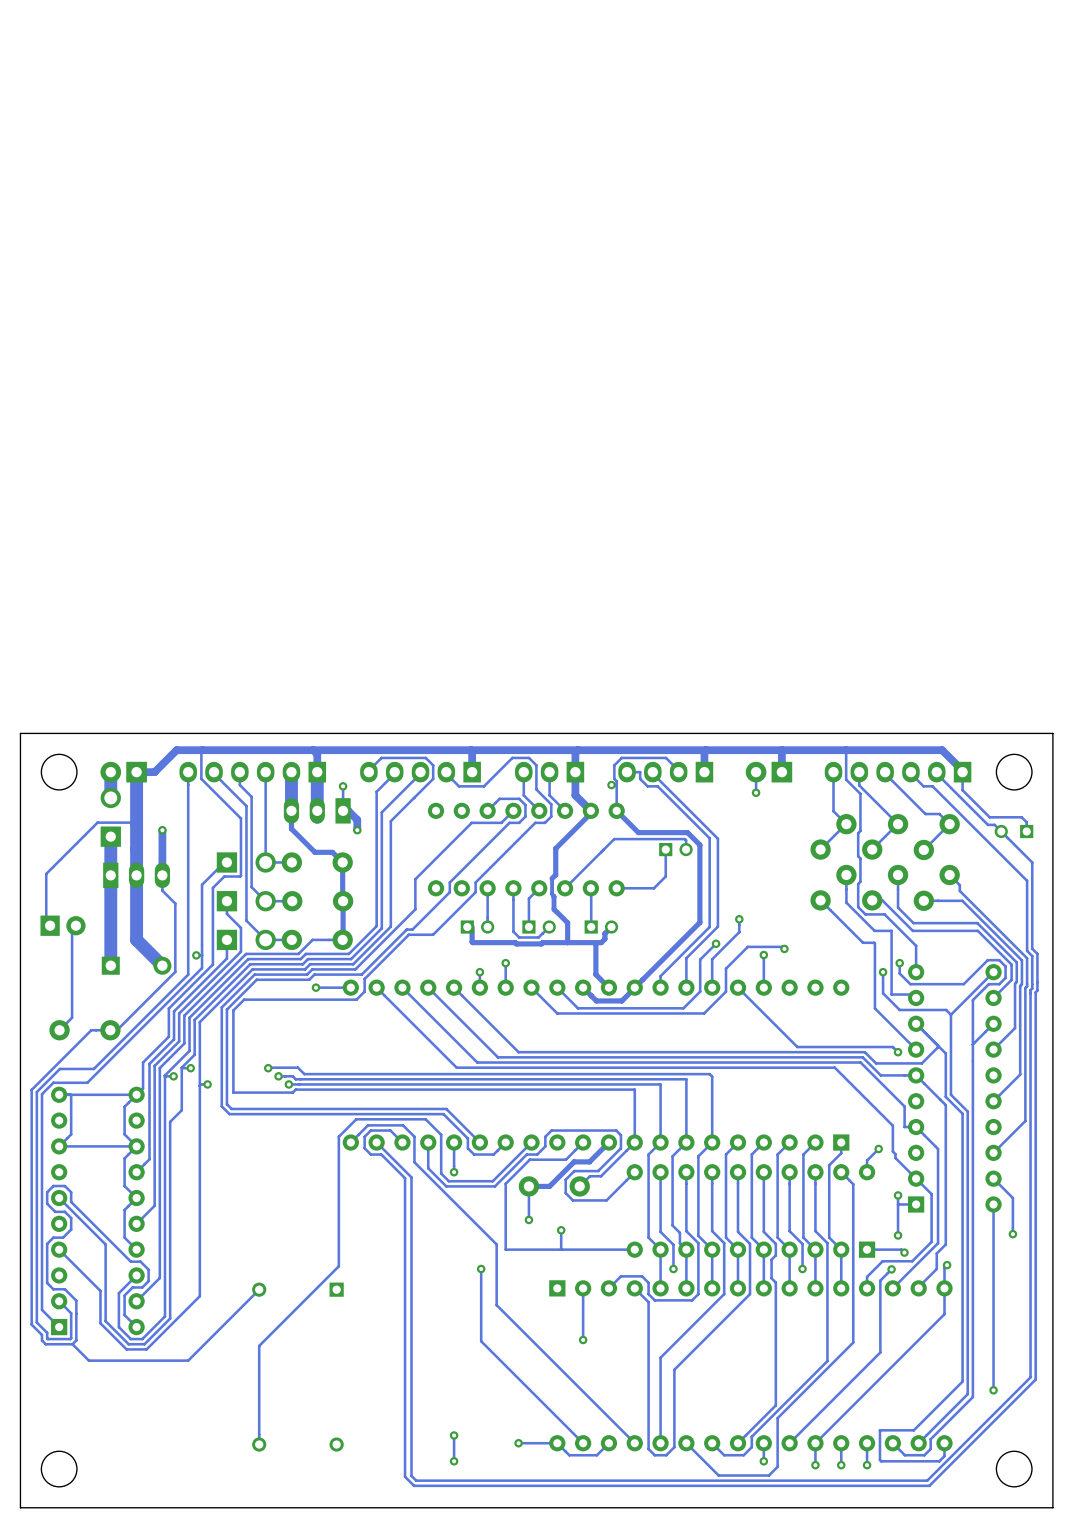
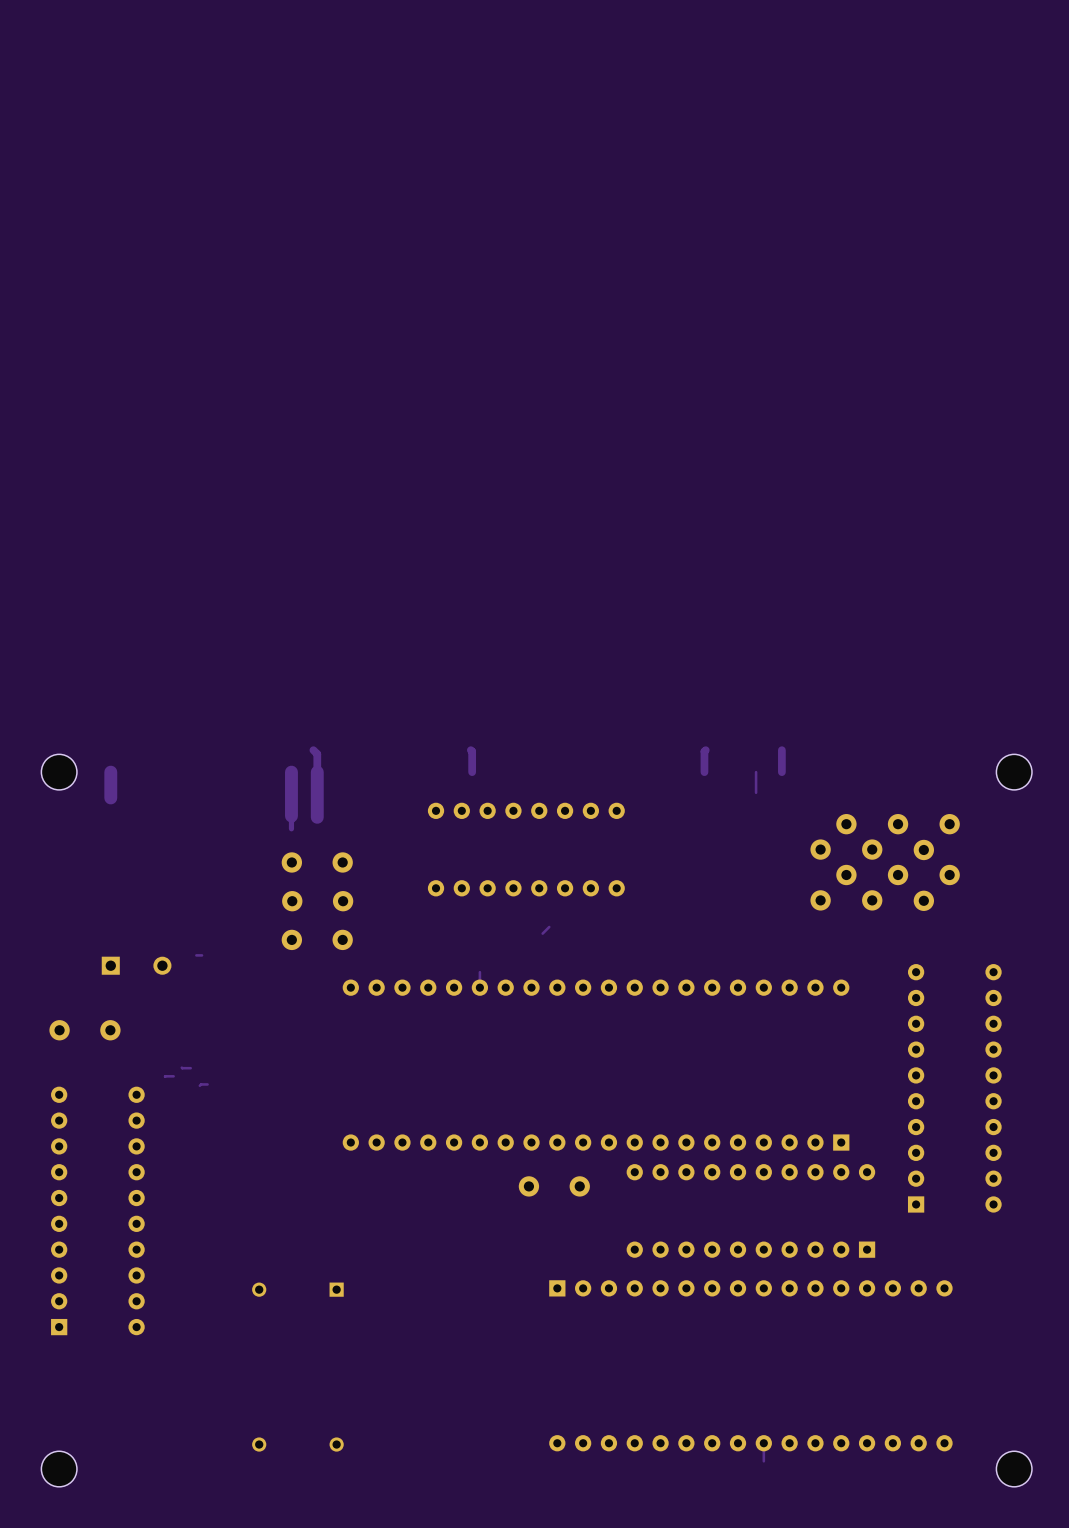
board edge: (1052, 733) (1052, 1507) (20, 1507) (20, 733) (1052, 733) -> none
track: (202, 750) (201, 778) (240, 818) (240, 875) (224, 876) (212, 887) (212, 964) (168, 1008) (168, 1036) (143, 1062) (143, 1088) (124, 1106) (124, 1134) (136, 1146) -> none
track: (577, 750) (575, 752) (575, 795) (590, 810) (590, 813) (555, 848) (555, 874) (552, 878) (552, 894) (554, 896) (554, 909) (556, 911) -> none
track: (845, 750) (846, 779) (860, 793) (860, 830) (858, 833) (860, 881) (858, 883) (858, 907) (865, 914) (884, 914) (916, 945) (916, 972) -> none
part: (123, 772) -> none
track: (188, 772) (188, 974) (93, 1068) (59, 1068) (36, 1092) (36, 1322) (47, 1332) (47, 1339) (71, 1338) (71, 1313) (59, 1301) -> none
track: (214, 772) (246, 806) (246, 920) (265, 939) (291, 939) -> none
track: (239, 772) (239, 785) (251, 796) (251, 887) (265, 901) (292, 901) -> none
part: (252, 772) -> none
track: (265, 772) (265, 862) (291, 862) -> none
track: (368, 772) (381, 757) (425, 757) (433, 765) (433, 778) (390, 821) (390, 926) (353, 964) (310, 964) (305, 969) (252, 969) (199, 1022) (199, 1296) (146, 1349) (126, 1349) (100, 1323) (100, 1290) (59, 1249) -> none
track: (394, 772) (376, 791) (376, 926) (348, 953) (305, 953) (300, 959) (248, 959) (189, 1017) (189, 1050) (164, 1075) (164, 1316) (142, 1339) (130, 1339) (118, 1327) (118, 1293) (136, 1275) -> none
track: (420, 772) (381, 812) (381, 928) (351, 959) (308, 959) (302, 964) (250, 964) (194, 1019) (194, 1054) (181, 1067) (181, 1110) (170, 1121) (170, 1318) (144, 1344) (128, 1344) (105, 1321) (105, 1244) (59, 1198) -> none
part: (420, 772) -> none
track: (446, 772) (458, 786) (484, 786) (512, 757) (529, 757) (536, 765) (536, 789) (551, 804) (551, 816) (545, 822) (535, 822) (475, 882) (475, 892) (433, 934) (408, 934) (364, 979) (364, 991) (356, 999) (244, 999) (233, 1010) (233, 1092) (292, 1092) (295, 1089) (634, 1089) (634, 1142) (601, 1176) (589, 1176) (579, 1186) -> none
track: (523, 772) (523, 795) (539, 810) -> none
track: (549, 772) (549, 795) (565, 810) -> none
part: (549, 772) -> none
track: (627, 772) (640, 772) (640, 778) (647, 786) (657, 786) (709, 838) (709, 927) (660, 976) (660, 987) -> none
track: (652, 772) (717, 838) (717, 926) (686, 958) (686, 987) -> none
part: (665, 772) -> none
track: (678, 772) (665, 757) (621, 757) (614, 765) (614, 778) (616, 781) (616, 810) (638, 832) (687, 832) (699, 844) (699, 922) (621, 1000) (596, 1000) (583, 987) -> none
part: (768, 772) -> none
track: (833, 772) (833, 811) (846, 824) (820, 849) -> none
track: (859, 772) (859, 785) (898, 824) (872, 849) -> none
track: (885, 772) (925, 814) (939, 814) (949, 824) (923, 849) -> none
part: (898, 772) -> none
track: (910, 772) (923, 786) (932, 786) (1027, 880) (1027, 950) (1032, 956) (1032, 988) (1030, 990) (1030, 1377) (927, 1480) (416, 1480) (411, 1475) (411, 1177) (376, 1142) -> none
track: (936, 772) (987, 824) (994, 824) (1032, 862) (1032, 948) (1037, 953) (1037, 990) (1035, 992) (1035, 1379) (929, 1485) (414, 1485) (405, 1476) (405, 1178) (381, 1154) (370, 1154) (364, 1148) (364, 1136) (370, 1130) (390, 1130) (402, 1142) -> none
via: (611, 785) -> none
track: (343, 786) (343, 810) (348, 810) (357, 819) (357, 830) -> none
via: (343, 786) -> none
via: (756, 792) -> none
part: (317, 810) -> none
track: (487, 810) (499, 798) (519, 798) (525, 805) (525, 816) (519, 822) (509, 822) (449, 882) (449, 892) (412, 929) (406, 929) (361, 974) (314, 974) (309, 979) (256, 979) (226, 1009) (226, 1104) (231, 1108) (446, 1108) (479, 1142) -> none
track: (513, 810) (501, 822) (471, 822) (415, 879) (415, 909) (355, 969) (312, 969) (307, 974) (254, 974) (221, 1007) (221, 1106) (229, 1114) (443, 1114) (467, 1138) (467, 1148) (474, 1154) (493, 1154) (505, 1142) -> none
part: (110, 817) -> none
track: (136, 823) (97, 822) (46, 873) (46, 921) (50, 925) -> none
track: (291, 823) (291, 828) (314, 852) (332, 852) (342, 862) (343, 939) (312, 939) (298, 953) (246, 953) (184, 1015) (184, 1043) (159, 1068) (159, 1278) (136, 1301) -> none
track: (162, 830) (162, 890) (175, 903) (175, 971) (116, 1030) (91, 1030) (31, 1089) (31, 1324) (42, 1334) (42, 1340) (45, 1344) (72, 1344) -> none
via: (162, 830) -> none
via: (357, 830) -> none
part: (1013, 831) -> none
track: (1026, 831) (1026, 822) (1021, 817) (989, 817) (962, 790) (962, 770) (942, 750) (176, 750) (154, 772) (136, 772) (136, 939) (162, 965) -> none
track: (110, 836) (110, 965) -> none
track: (665, 849) (665, 876) (653, 888) (616, 888) -> none
part: (675, 849) -> none
track: (686, 849) (684, 839) (614, 839) (565, 888) -> none
track: (226, 862) (224, 862) (202, 884) (202, 968) (87, 1082) (53, 1082) (42, 1094) (42, 1309) (59, 1327) -> none
part: (246, 862) -> none
track: (846, 874) (846, 902) (874, 930) (891, 930) (891, 994) (912, 994) (916, 997) -> none
track: (898, 874) (898, 907) (913, 923) (977, 923) (1016, 962) (1015, 1028) (993, 1049) -> none
track: (949, 874) (959, 885) (959, 890) (1027, 958) (1025, 1121) (993, 1152) -> none
part: (136, 875) -> none
track: (487, 888) (487, 927) -> none
track: (513, 888) (513, 931) (519, 937) (538, 937) (542, 933) -> none
track: (539, 888) (528, 898) (528, 927) -> none
track: (590, 888) (591, 927) -> none
track: (820, 900) (862, 942) (874, 943) (874, 1008) (916, 1049) -> none
track: (872, 900) (882, 900) (912, 930) (977, 930) (1011, 964) (1011, 979) (993, 997) -> none
track: (923, 900) (962, 900) (1021, 960) (1020, 1074) (993, 1101) -> none
track: (226, 901) (226, 913) (240, 927) (240, 951) (179, 1013) (179, 1041) (154, 1065) (154, 1205) (136, 1223) -> none
part: (246, 901) -> none
track: (556, 911) (567, 922) (567, 942) -> none
track: (739, 919) (739, 932) (712, 959) (712, 987) -> none
via: (739, 919) -> none
part: (63, 925) -> none
track: (75, 925) (72, 929) (72, 1017) (59, 1030) -> none
part: (477, 927) -> none
part: (539, 927) -> none
part: (601, 927) -> none
track: (611, 927) (604, 933) (604, 939) (601, 942) (541, 943) (472, 942) (472, 927) (467, 927) -> none
track: (226, 939) (226, 958) (174, 1011) (174, 1039) (149, 1063) (149, 1159) (136, 1172) -> none
part: (246, 939) -> none
track: (595, 942) (595, 974) (608, 987) -> none
track: (716, 943) (700, 959) (700, 991) (683, 1008) (577, 1008) (557, 987) -> none
via: (716, 943) -> none
track: (784, 948) (782, 946) (747, 946) (726, 968) (726, 991) (704, 1013) (557, 1013) (531, 987) -> none
via: (784, 948) -> none
via: (196, 955) -> none
track: (763, 955) (763, 987) -> none
via: (763, 955) -> none
track: (505, 963) (505, 987) -> none
via: (505, 963) -> none
track: (899, 963) (899, 973) (910, 984) (963, 984) (987, 960) (999, 960) (1005, 966) (1005, 977) (999, 984) (988, 984) (972, 1000) (972, 1397) (930, 1439) (930, 1449) (924, 1455) (904, 1455) (892, 1443) -> none
via: (899, 963) -> none
via: (479, 972) -> none
track: (883, 972) (883, 993) (899, 1009) (946, 1009) (950, 1014) -> none
via: (883, 972) -> none
track: (993, 972) (950, 1014) -> none
via: (315, 987) -> none
track: (350, 987) (315, 987) -> none
track: (376, 987) (456, 1067) (834, 1067) (892, 1125) (892, 1151) (895, 1158) (914, 1178) -> none
track: (402, 987) (477, 1062) (860, 1062) (904, 1106) (904, 1127) (916, 1127) (938, 1148) (938, 1243) (892, 1288) -> none
track: (428, 987) (497, 1057) (862, 1057) (880, 1075) (916, 1075) (945, 1105) (945, 1244) (936, 1253) (936, 1269) (917, 1288) -> none
track: (454, 987) (518, 1052) (864, 1052) (876, 1063) (921, 1063) (938, 1045) -> none
track: (738, 987) (797, 1047) (892, 1047) (898, 1052) -> none
track: (950, 1014) (950, 1094) (967, 1111) (967, 1394) (918, 1443) -> none
track: (916, 1023) (945, 1053) (945, 1096) (962, 1113) (962, 1381) (913, 1430) (879, 1430) (879, 1460) (939, 1461) (944, 1456) (944, 1443) -> none
track: (993, 1023) (972, 1044) -> none
via: (898, 1052) -> none
via: (190, 1068) -> none
track: (268, 1068) (297, 1067) (304, 1074) (709, 1074) (712, 1076) (712, 1142) (698, 1156) (698, 1235) (712, 1249) (712, 1288) -> none
via: (268, 1068) -> none
via: (173, 1076) -> none
track: (278, 1076) (292, 1076) (295, 1079) (686, 1079) (686, 1142) (672, 1156) (672, 1225) (679, 1232) (679, 1243) (686, 1249) (686, 1288) -> none
via: (278, 1076) -> none
via: (207, 1084) -> none
track: (288, 1084) (660, 1084) (660, 1142) (648, 1154) (648, 1237) (660, 1249) (660, 1288) -> none
via: (288, 1084) -> none
track: (70, 1094) (71, 1134) (59, 1146) (136, 1146) -> none
track: (136, 1094) (59, 1094) -> none
track: (350, 1142) (368, 1125) (403, 1125) (414, 1136) (414, 1162) (496, 1244) (496, 1305) (634, 1443) -> none
track: (428, 1142) (428, 1168) (446, 1186) (494, 1186) (526, 1154) (537, 1154) (545, 1146) (545, 1136) (551, 1130) (616, 1130) (620, 1135) (620, 1148) (598, 1171) (574, 1171) (565, 1179) (565, 1193) (573, 1200) (606, 1200) (634, 1172) -> none
track: (454, 1142) (454, 1172) -> none
track: (531, 1142) (492, 1181) (448, 1181) (441, 1173) (441, 1134) (425, 1119) (356, 1119) (338, 1136) (338, 1266) (259, 1345) (259, 1444) -> none
track: (583, 1142) (565, 1159) (529, 1159) (505, 1183) (505, 1249) (634, 1249) -> none
track: (608, 1142) (589, 1161) (574, 1161) (549, 1186) (528, 1186) (528, 1219) -> none
track: (738, 1142) (726, 1154) (726, 1237) (738, 1249) (738, 1288) -> none
track: (763, 1142) (751, 1154) (751, 1237) (763, 1249) (763, 1288) -> none
track: (789, 1142) (777, 1154) (777, 1237) (789, 1249) (789, 1288) -> none
track: (815, 1142) (803, 1154) (803, 1237) (815, 1249) (815, 1288) -> none
track: (841, 1142) (841, 1153) (829, 1165) (829, 1237) (841, 1249) (841, 1288) -> none
track: (136, 1146) (124, 1158) (124, 1186) (136, 1198) (124, 1210) (124, 1237) (136, 1249) -> none
track: (878, 1148) (867, 1160) (867, 1172) -> none
via: (878, 1148) -> none
via: (454, 1172) -> none
track: (660, 1172) (660, 1231) (673, 1244) (673, 1269) -> none
track: (686, 1172) (686, 1231) (698, 1243) (698, 1294) (692, 1300) (654, 1300) (648, 1294) (648, 1282) (642, 1276) (620, 1276) (608, 1288) -> none
track: (712, 1172) (712, 1231) (724, 1243) (724, 1294) (660, 1357) (660, 1443) -> none
track: (738, 1172) (738, 1231) (750, 1243) (750, 1294) (674, 1369) (674, 1447) (666, 1455) (654, 1455) (648, 1449) (648, 1302) (634, 1288) -> none
track: (763, 1172) (763, 1231) (775, 1243) (775, 1255) (771, 1259) (771, 1278) (775, 1282) (775, 1405) (738, 1443) -> none
track: (789, 1172) (789, 1231) (802, 1244) (802, 1269) -> none
track: (815, 1172) (815, 1231) (827, 1243) (827, 1361) (751, 1436) (751, 1447) (743, 1455) (724, 1455) (712, 1443) -> none
track: (841, 1172) (853, 1184) (853, 1342) (777, 1418) (777, 1466) (768, 1475) (718, 1475) (686, 1443) -> none
track: (916, 1178) (931, 1194) (931, 1241) (912, 1261) (882, 1261) (867, 1276) (867, 1288) -> none
track: (993, 1178) (1012, 1198) (1012, 1234) -> none
track: (898, 1195) (898, 1235) -> none
via: (898, 1195) -> none
track: (916, 1204) (898, 1204) -> none
track: (993, 1204) (993, 1390) -> none
via: (528, 1219) -> none
track: (561, 1230) (561, 1249) -> none
via: (561, 1230) -> none
via: (1012, 1234) -> none
via: (898, 1235) -> none
track: (867, 1249) (901, 1249) (904, 1252) -> none
via: (904, 1252) -> none
track: (947, 1265) (944, 1267) (944, 1314) (815, 1443) (815, 1465) -> none
via: (947, 1265) -> none
track: (481, 1269) (481, 1341) (583, 1443) -> none
via: (481, 1269) -> none
via: (673, 1269) -> none
via: (802, 1269) -> none
track: (891, 1269) (880, 1280) (880, 1352) (789, 1443) -> none
via: (891, 1269) -> none
track: (583, 1288) (583, 1339) -> none
track: (259, 1289) (188, 1360) (88, 1360) (72, 1344) -> none
track: (136, 1327) (124, 1315) (124, 1295) (132, 1287) (142, 1287) (148, 1281) (148, 1269) (140, 1261) (130, 1261) (71, 1201) (71, 1192) (64, 1186) (53, 1186) (47, 1192) (47, 1203) (55, 1211) (64, 1211) (71, 1218) (71, 1229) (63, 1237) (53, 1237) (47, 1243) (47, 1283) (53, 1289) (64, 1289) (76, 1300) (76, 1340) (72, 1344) -> none
via: (583, 1339) -> none
via: (993, 1390) -> none
track: (454, 1435) (454, 1461) -> none
via: (454, 1435) -> none
via: (518, 1443) -> none
track: (608, 1443) (596, 1455) (569, 1455) (557, 1443) (518, 1443) -> none
track: (841, 1443) (841, 1465) -> none
track: (867, 1443) (867, 1465) -> none
via: (454, 1461) -> none
via: (763, 1461) -> none
via: (815, 1465) -> none
via: (841, 1465) -> none
via: (867, 1465) -> none

